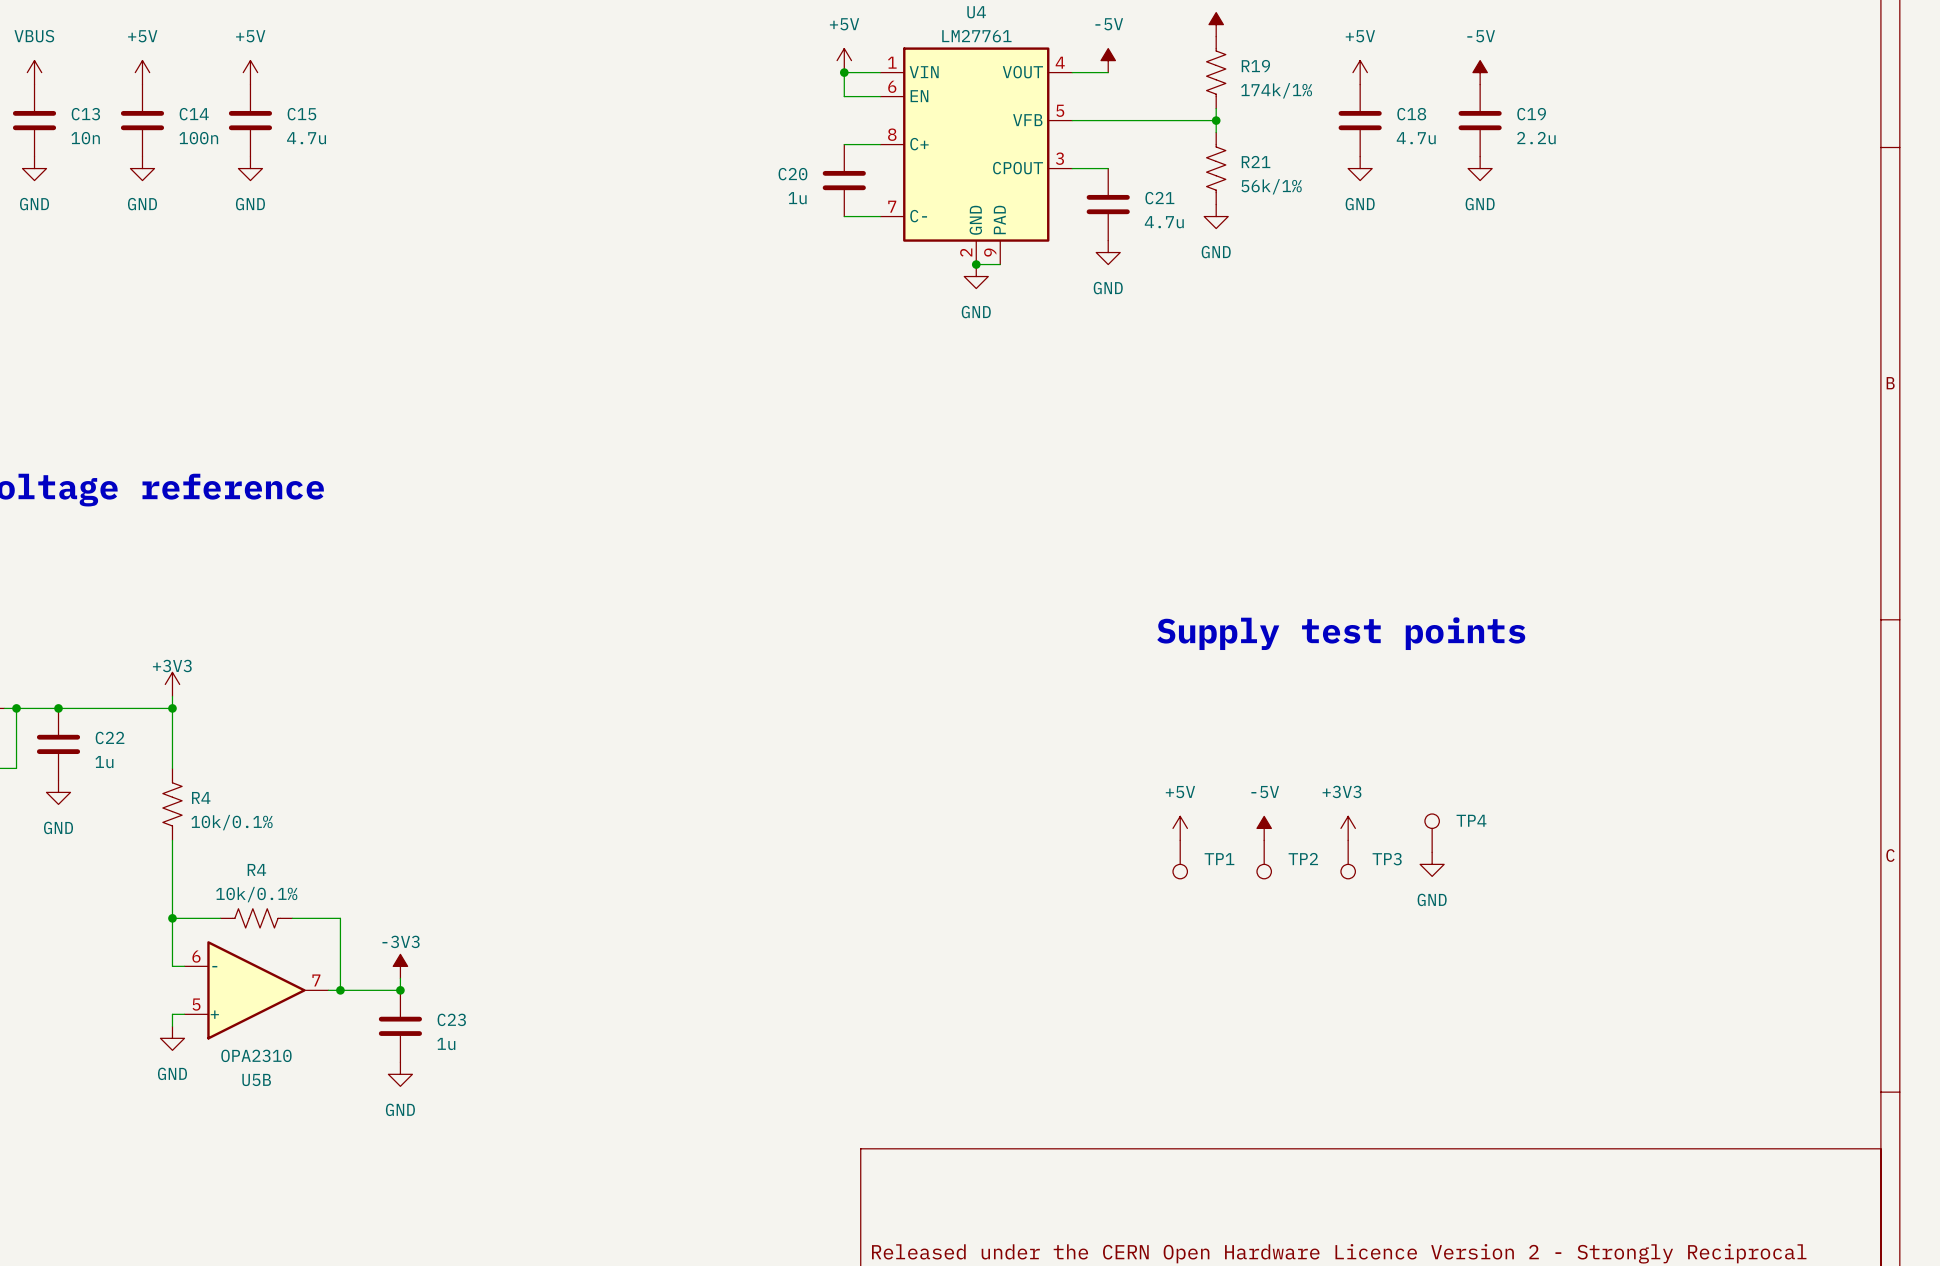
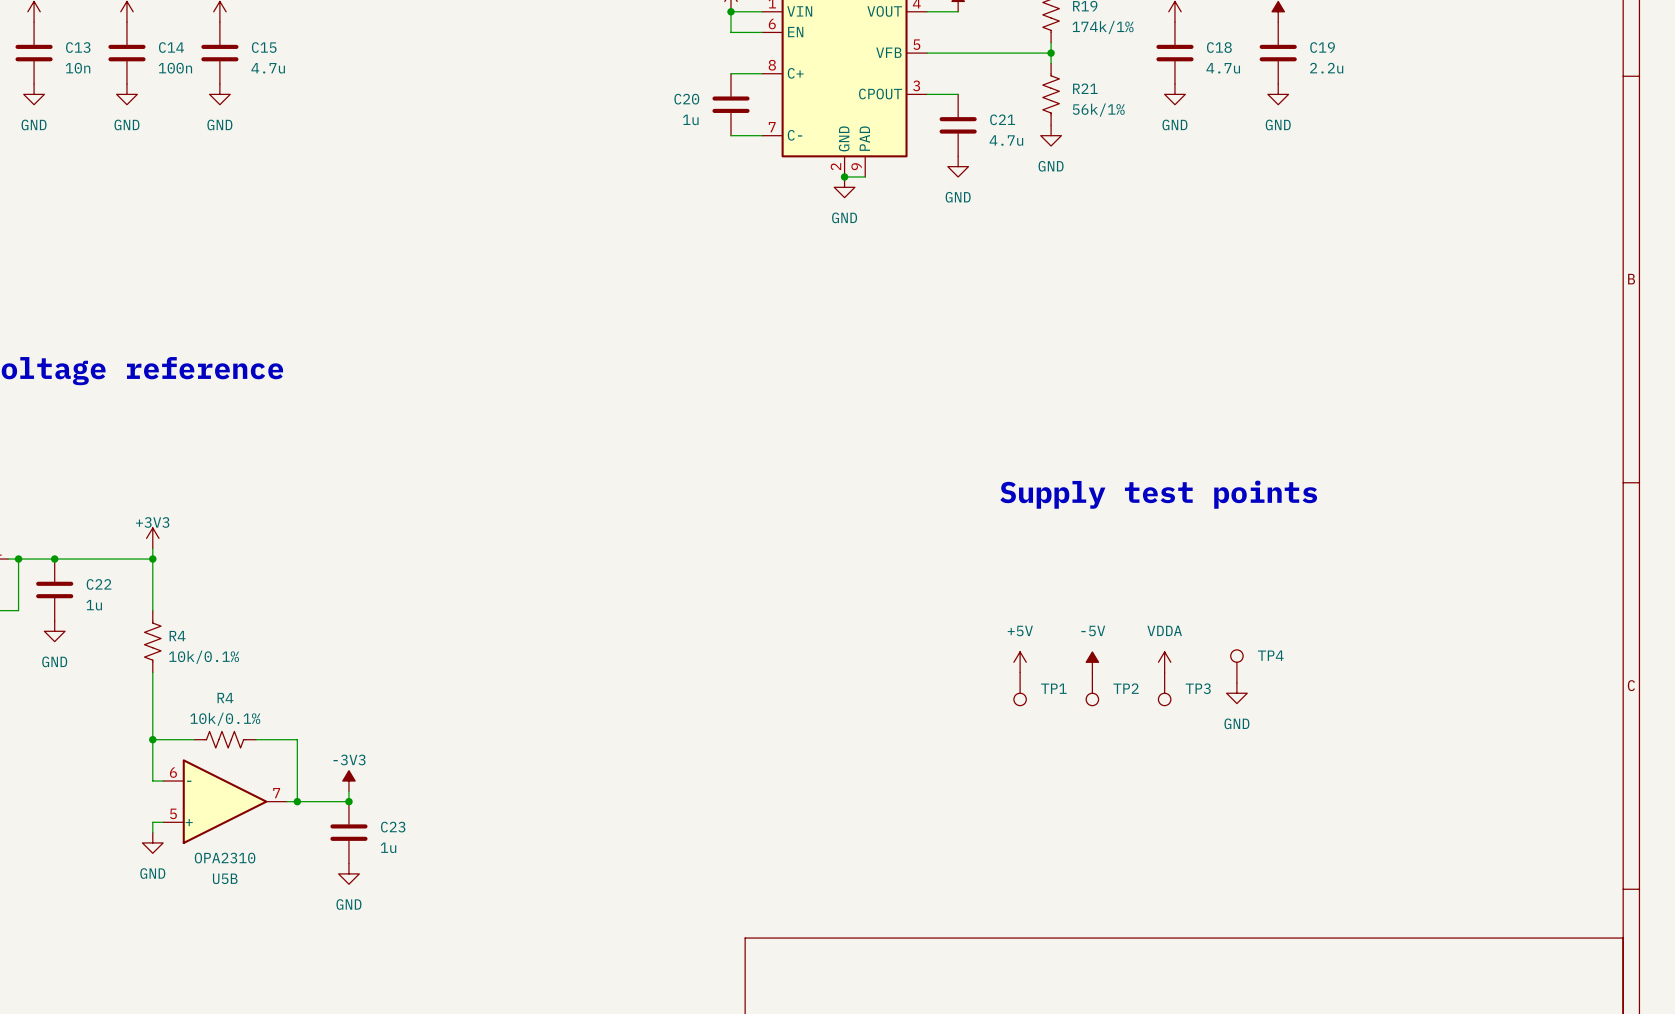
power symbol: +3V3 (1348, 828) -> VDDA (1164, 662)

